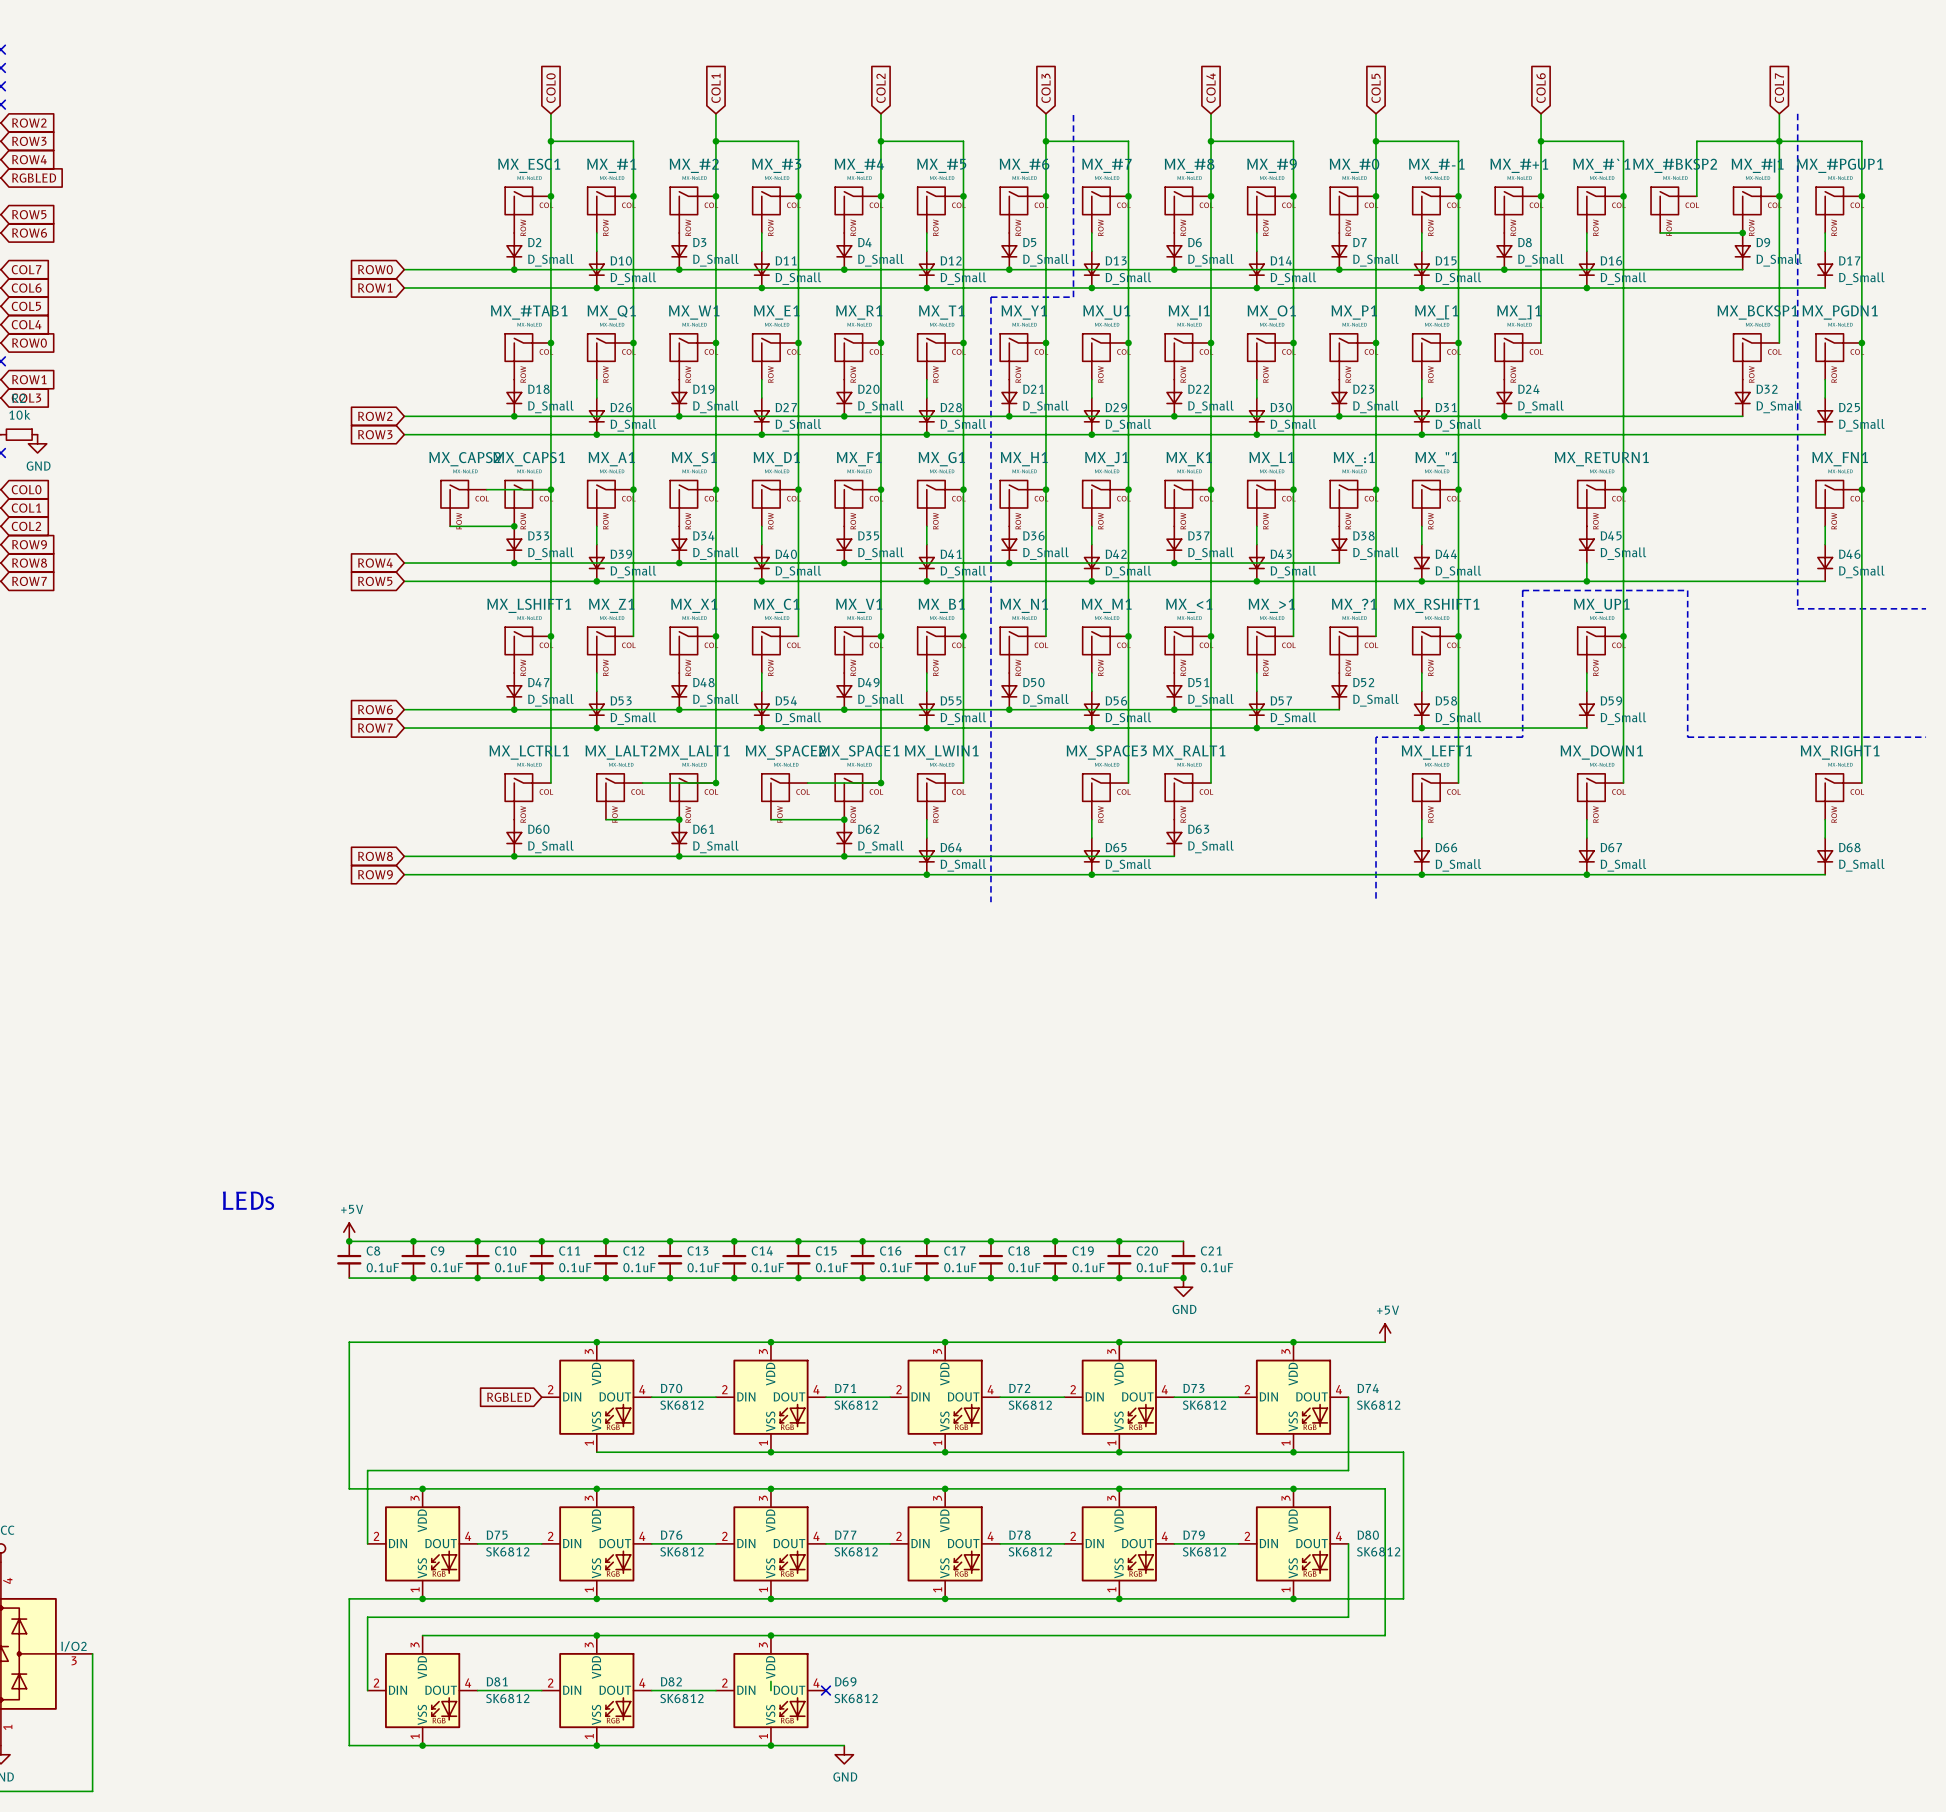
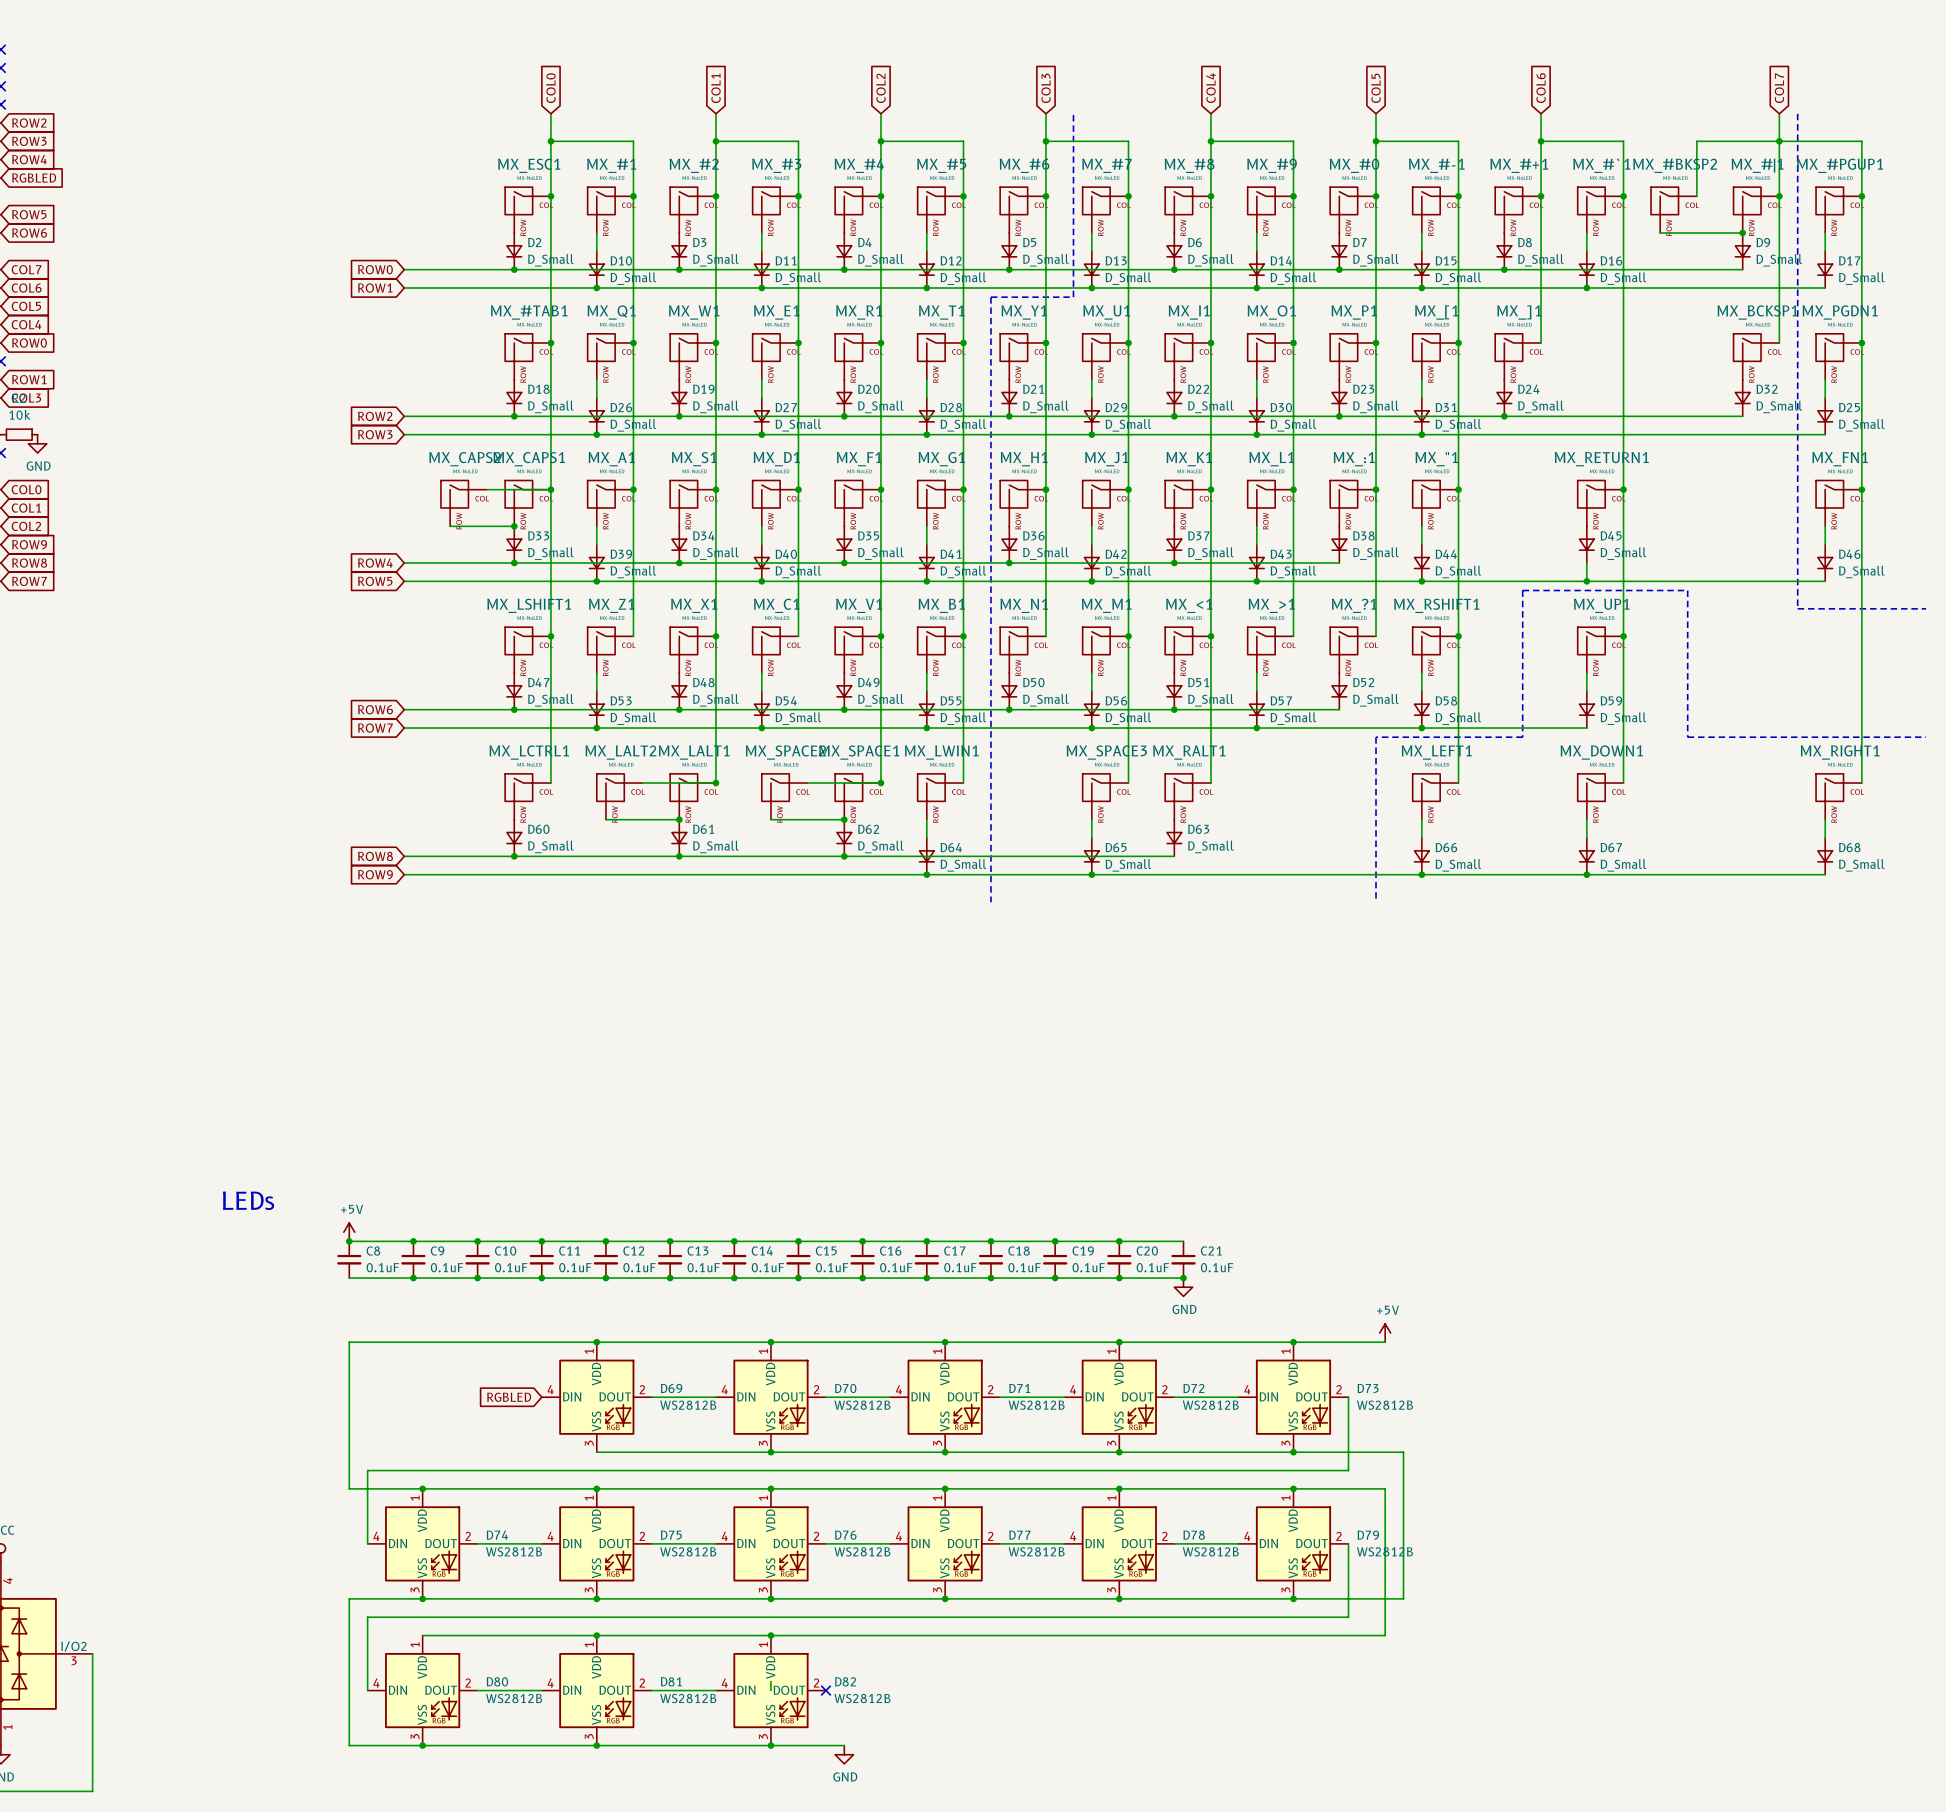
D70 pin number: 3 (589, 1351) -> 1 (763, 1351)
D71 pin number: 3 (763, 1351) -> 1 (937, 1351)
D72 pin number: 3 (937, 1351) -> 1 (1111, 1351)
D73 pin number: 3 (1111, 1351) -> 1 (1285, 1351)
D74 pin number: 3 (1286, 1351) -> 1 (415, 1498)
D70 pin number: 2 (550, 1389) -> 4 (724, 1389)
D70 pin number: 4 (642, 1389) -> 2 (816, 1389)
D71 pin number: 2 (724, 1389) -> 4 (899, 1389)
D71 pin number: 4 (816, 1389) -> 2 (990, 1389)
D72 pin number: 2 (899, 1389) -> 4 (1073, 1389)
D72 pin number: 4 (990, 1389) -> 2 (1164, 1389)
D73 pin number: 2 (1073, 1389) -> 4 (1247, 1389)
D73 pin number: 4 (1164, 1389) -> 2 (1339, 1389)
D74 pin number: 2 (1247, 1389) -> 4 (376, 1536)
D74 pin number: 4 (1339, 1389) -> 2 (468, 1536)
D70 position: (596, 1397) -> (770, 1397)
D71 position: (770, 1397) -> (945, 1397)
D72 position: (945, 1397) -> (1119, 1397)
D73 position: (1119, 1397) -> (1293, 1397)
D74 position: (1293, 1397) -> (422, 1543)
D70 value: SK6812 (681, 1405) -> WS2812B (862, 1405)
D71 value: SK6812 (856, 1405) -> WS2812B (1036, 1405)
D72 value: SK6812 (1030, 1405) -> WS2812B (1210, 1405)
D73 value: SK6812 (1204, 1405) -> WS2812B (1384, 1405)
D74 value: SK6812 (1378, 1405) -> WS2812B (514, 1551)
D70 pin number: 1 (589, 1443) -> 3 (763, 1443)
D71 pin number: 1 (763, 1443) -> 3 (937, 1443)
D72 pin number: 1 (937, 1443) -> 3 (1111, 1443)
D73 pin number: 1 (1111, 1443) -> 3 (1286, 1443)
D74 pin number: 1 (1285, 1443) -> 3 (415, 1589)
D75 pin number: 3 (415, 1498) -> 1 (589, 1498)
D76 pin number: 3 (589, 1498) -> 1 (763, 1498)
D77 pin number: 3 (763, 1498) -> 1 (937, 1498)
D78 pin number: 3 (937, 1498) -> 1 (1111, 1498)
D79 pin number: 3 (1111, 1498) -> 1 (1285, 1498)
D80 pin number: 3 (1286, 1498) -> 1 (415, 1644)
D75 pin number: 2 (376, 1536) -> 4 (550, 1536)
D75 pin number: 4 (468, 1536) -> 2 (642, 1536)
D76 pin number: 2 (550, 1536) -> 4 (724, 1536)
D76 pin number: 4 (642, 1536) -> 2 (816, 1536)
D77 pin number: 2 (724, 1536) -> 4 (899, 1536)
D77 pin number: 4 (816, 1536) -> 2 (990, 1536)
D78 pin number: 2 (899, 1536) -> 4 (1073, 1536)
D78 pin number: 4 (990, 1536) -> 2 (1164, 1536)
D79 pin number: 2 (1073, 1536) -> 4 (1247, 1536)
D79 pin number: 4 (1164, 1536) -> 2 (1339, 1536)
D80 pin number: 2 (1247, 1536) -> 4 (376, 1683)
D80 pin number: 4 (1339, 1536) -> 2 (468, 1683)
D75 position: (422, 1543) -> (596, 1543)
D76 position: (596, 1543) -> (770, 1543)
D77 position: (770, 1543) -> (945, 1543)
D78 position: (945, 1543) -> (1119, 1543)
D79 position: (1119, 1543) -> (1293, 1543)
D80 position: (1293, 1543) -> (422, 1690)
D75 value: SK6812 (507, 1551) -> WS2812B (688, 1551)
D76 value: SK6812 (681, 1551) -> WS2812B (862, 1551)
D77 value: SK6812 (856, 1551) -> WS2812B (1036, 1551)
D78 value: SK6812 (1030, 1551) -> WS2812B (1210, 1551)
D79 value: SK6812 (1204, 1551) -> WS2812B (1384, 1551)
D80 value: SK6812 (1378, 1551) -> WS2812B (514, 1698)
D75 pin number: 1 (415, 1589) -> 3 (589, 1589)
D76 pin number: 1 (589, 1589) -> 3 (763, 1589)
D77 pin number: 1 (763, 1589) -> 3 (937, 1589)
D78 pin number: 1 (937, 1589) -> 3 (1111, 1589)
D79 pin number: 1 (1111, 1589) -> 3 (1286, 1589)
D80 pin number: 1 (1285, 1589) -> 3 (415, 1736)
D81 pin number: 3 (415, 1644) -> 1 (589, 1644)
D82 pin number: 3 (589, 1644) -> 1 (763, 1644)
D69 pin number: 3 (763, 1644) -> 1 (589, 1351)
D81 pin number: 2 (376, 1683) -> 4 (550, 1683)
D81 pin number: 4 (468, 1683) -> 2 (642, 1683)
D82 pin number: 2 (550, 1683) -> 4 (724, 1683)
D82 pin number: 4 (642, 1683) -> 2 (816, 1683)
D69 pin number: 2 (724, 1683) -> 4 (550, 1389)
D69 pin number: 4 (816, 1683) -> 2 (642, 1389)
D81 position: (422, 1690) -> (596, 1690)
D82 position: (596, 1690) -> (770, 1690)
D69 position: (770, 1690) -> (596, 1397)
D81 value: SK6812 (507, 1698) -> WS2812B (688, 1698)
D82 value: SK6812 (681, 1698) -> WS2812B (862, 1698)
D69 value: SK6812 (856, 1698) -> WS2812B (688, 1405)
D81 pin number: 1 (415, 1736) -> 3 (589, 1736)
D82 pin number: 1 (589, 1736) -> 3 (763, 1736)
D69 pin number: 1 (763, 1736) -> 3 (589, 1443)

